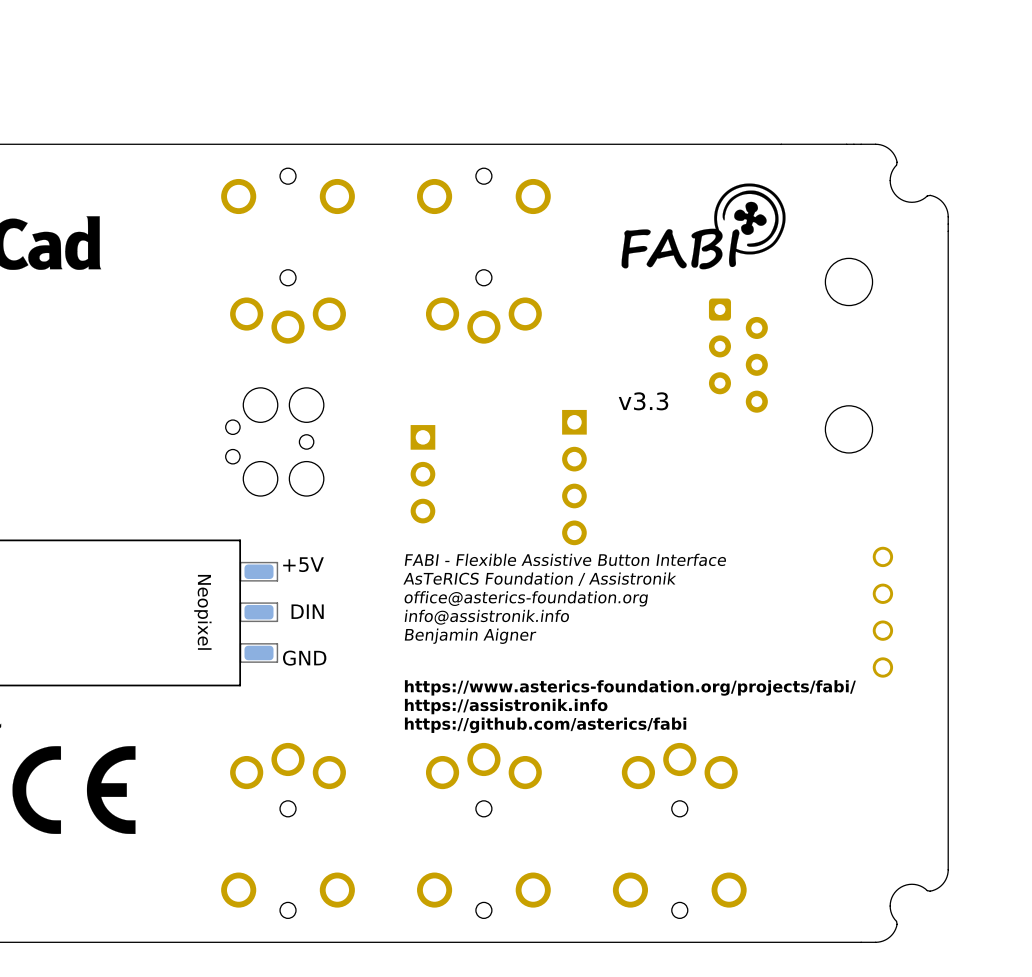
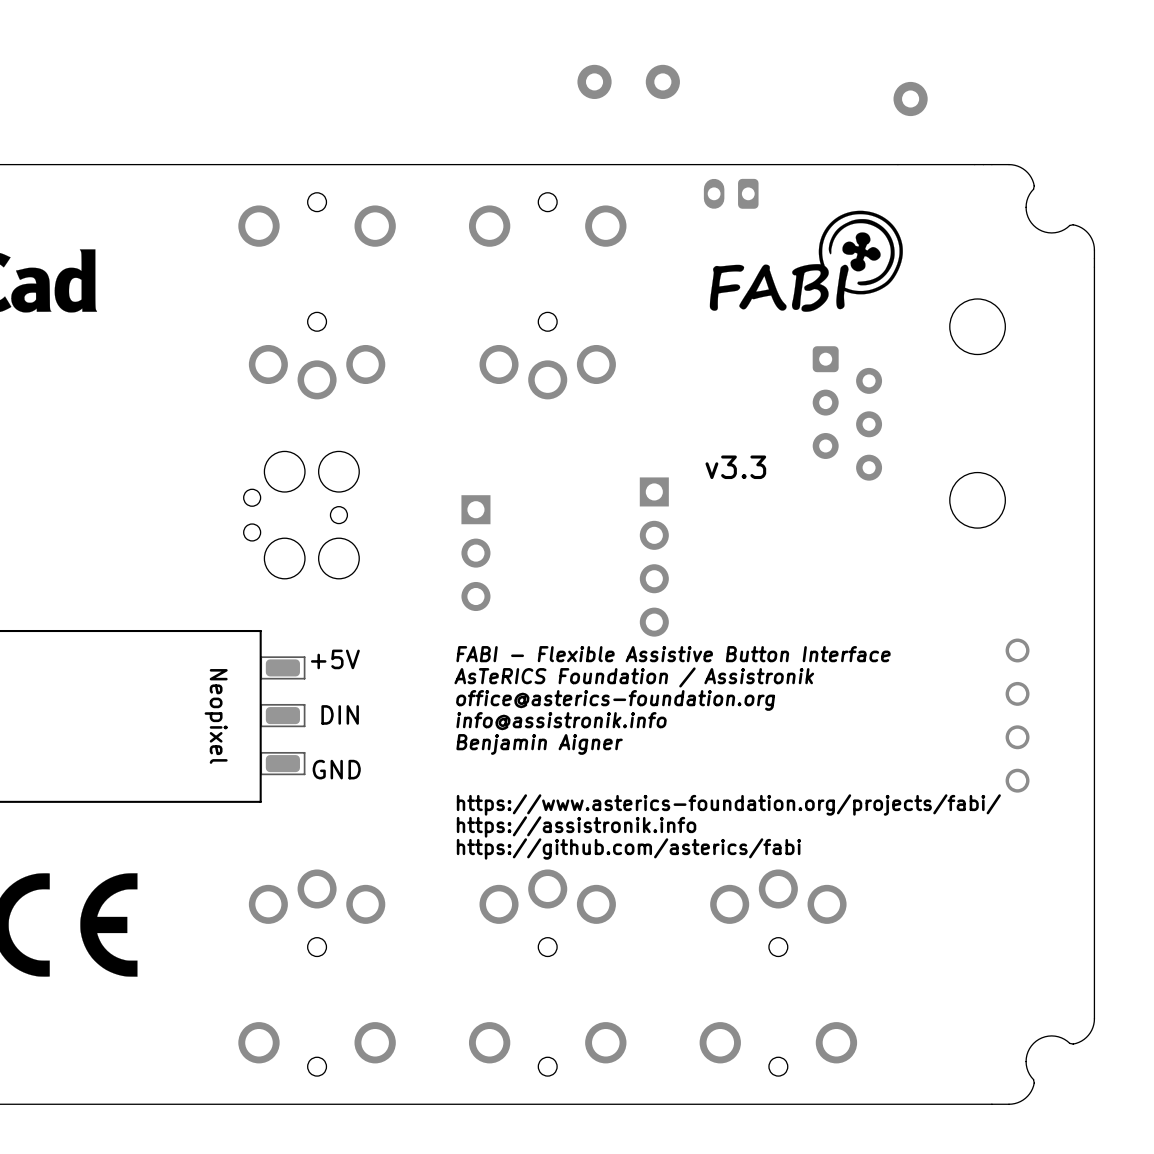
part: none -> (594, 81)
part: none -> (662, 81)
part: none -> (910, 99)
part: none -> (731, 193)

